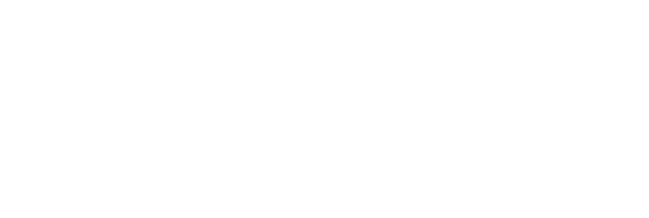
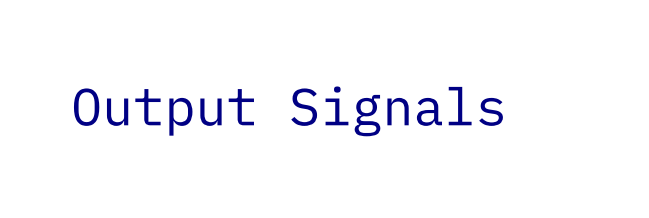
text: none -> Output Signals (288, 111)

